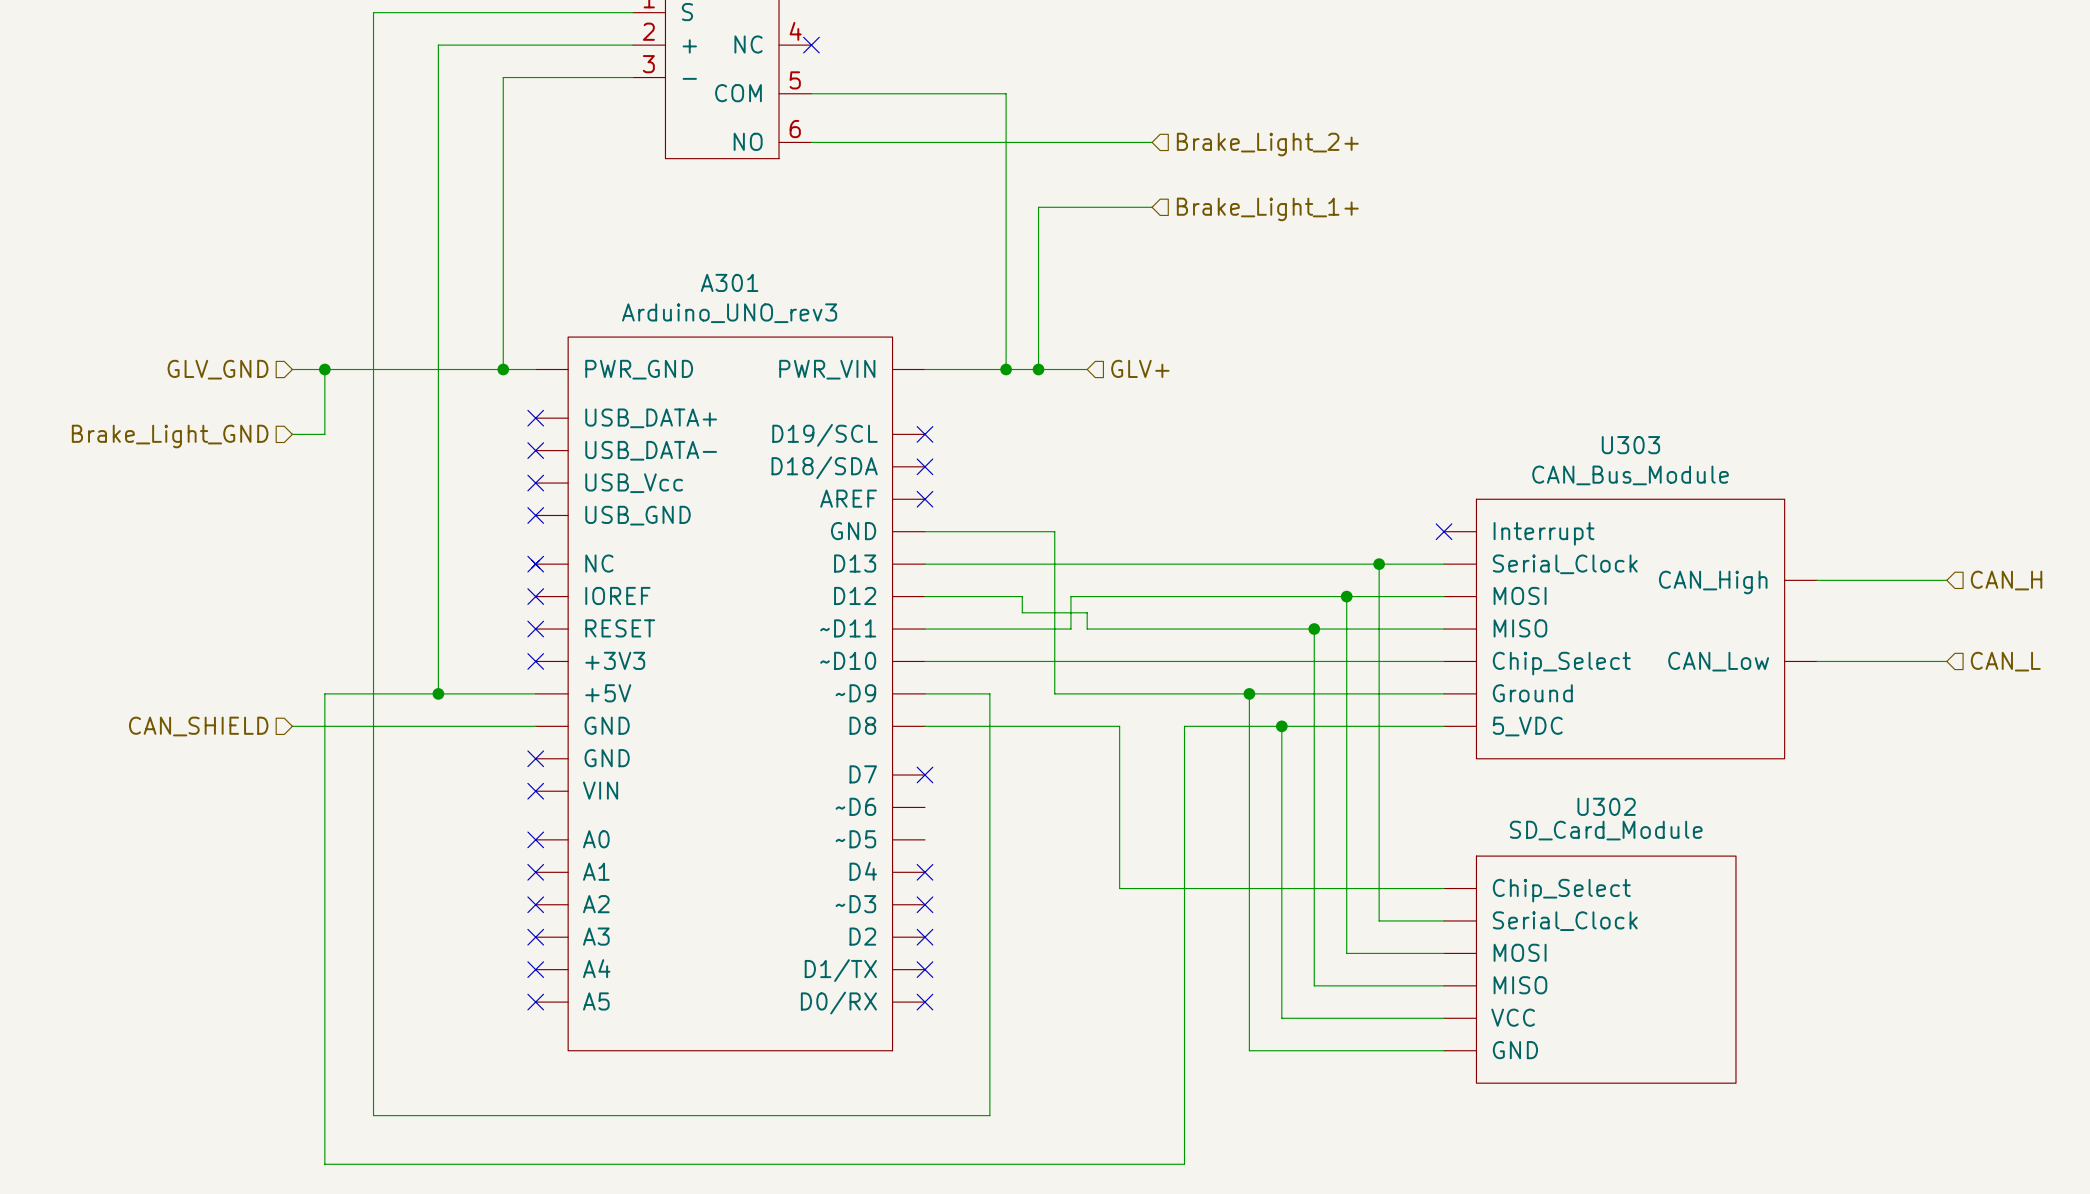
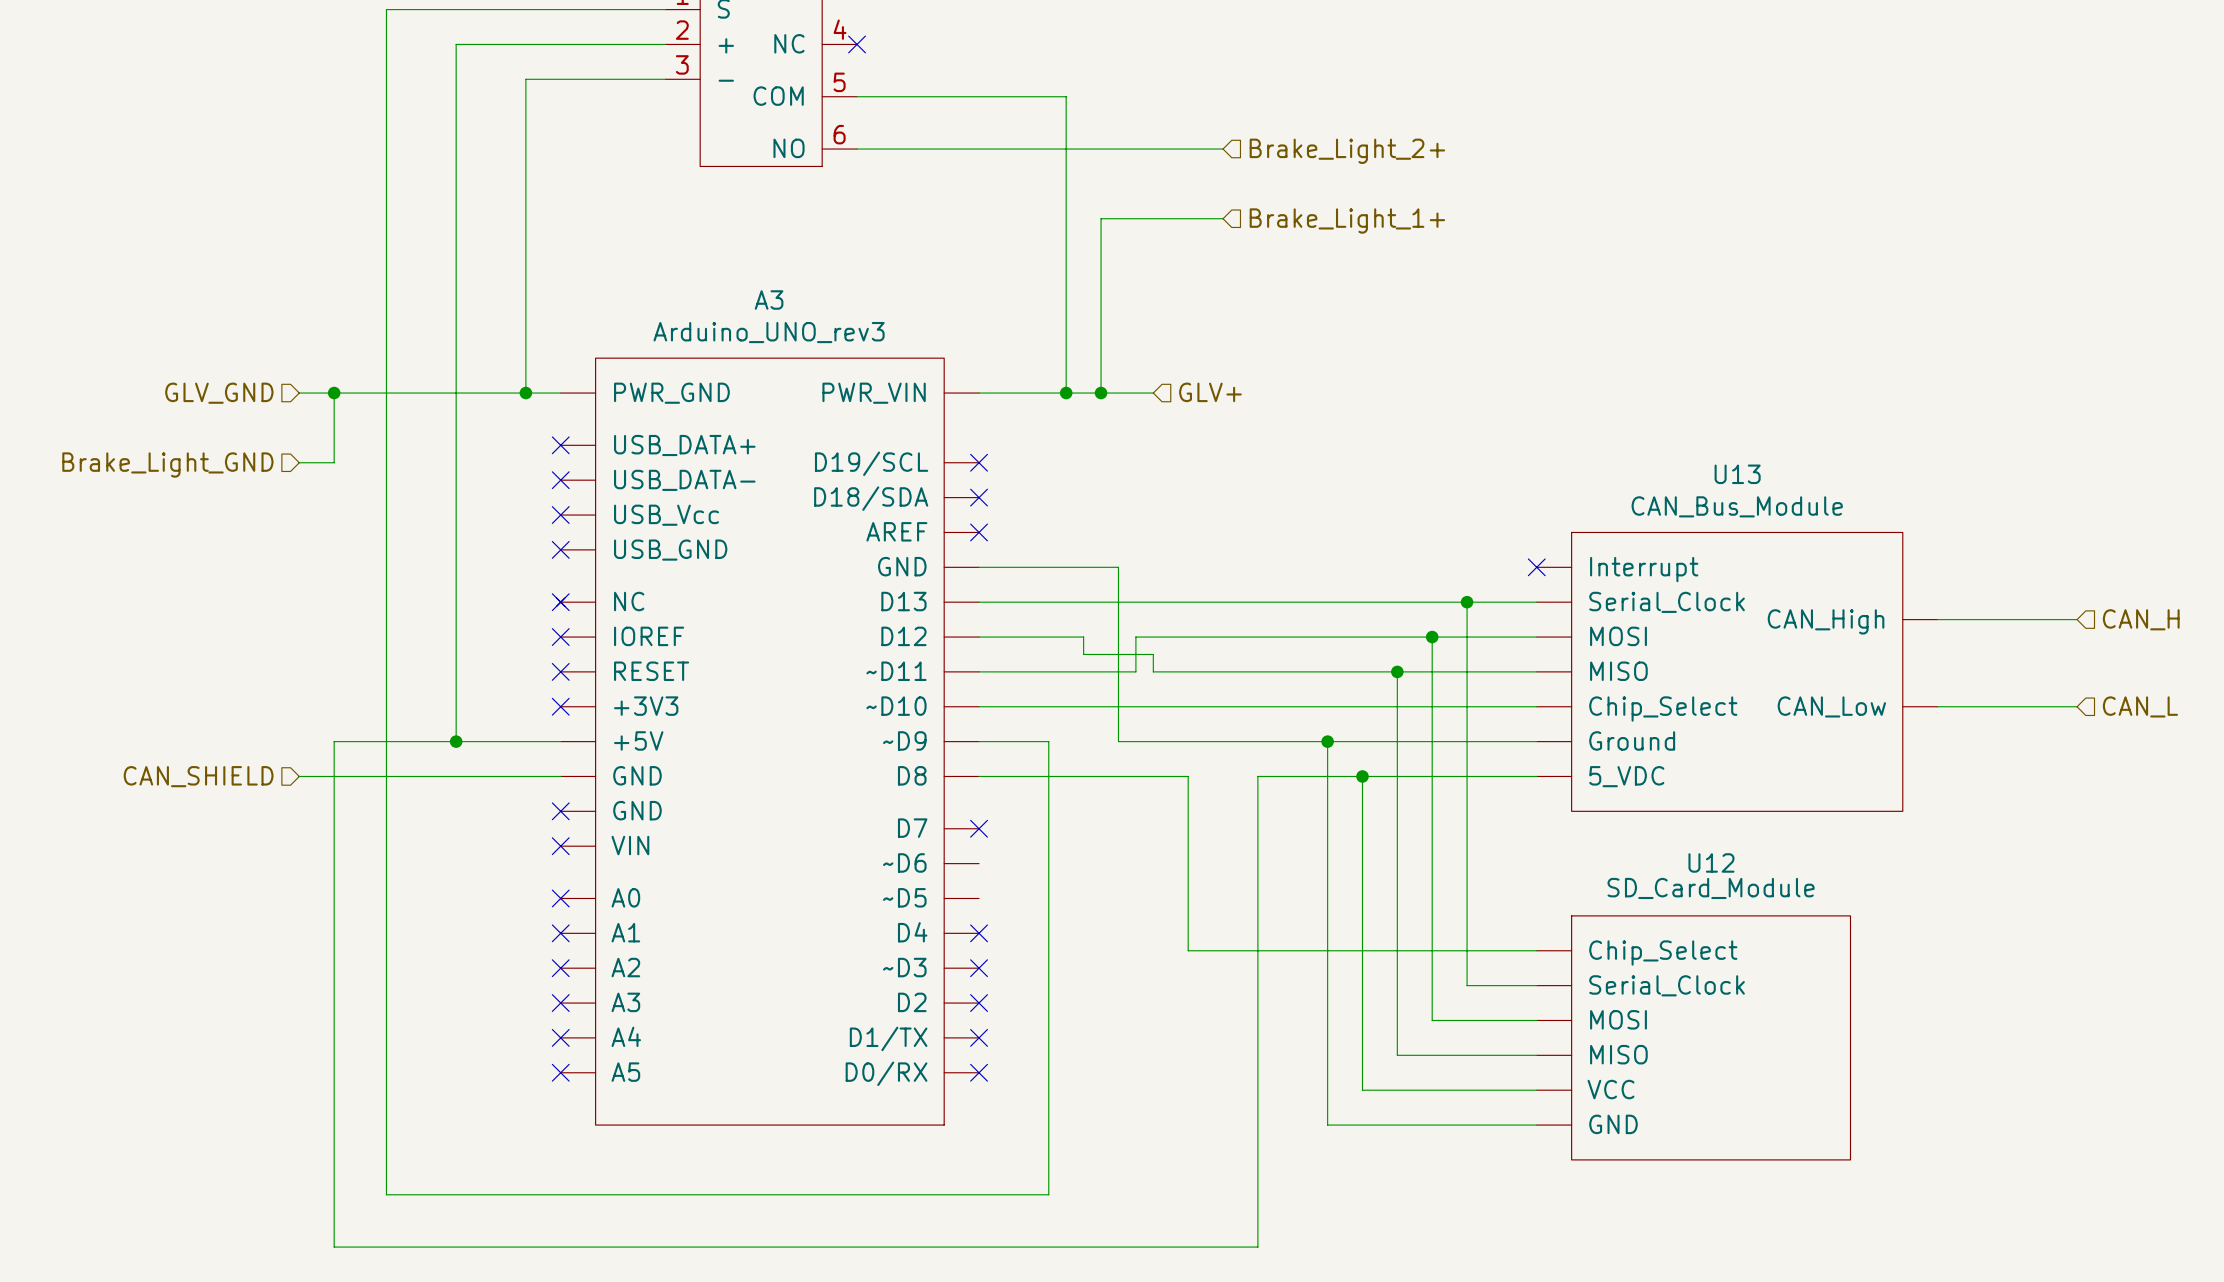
A301 name: A301 (729, 282) -> A3 (769, 300)
U303 name: U303 (1630, 445) -> U13 (1737, 474)
U302 name: U302 (1606, 806) -> U12 (1711, 862)

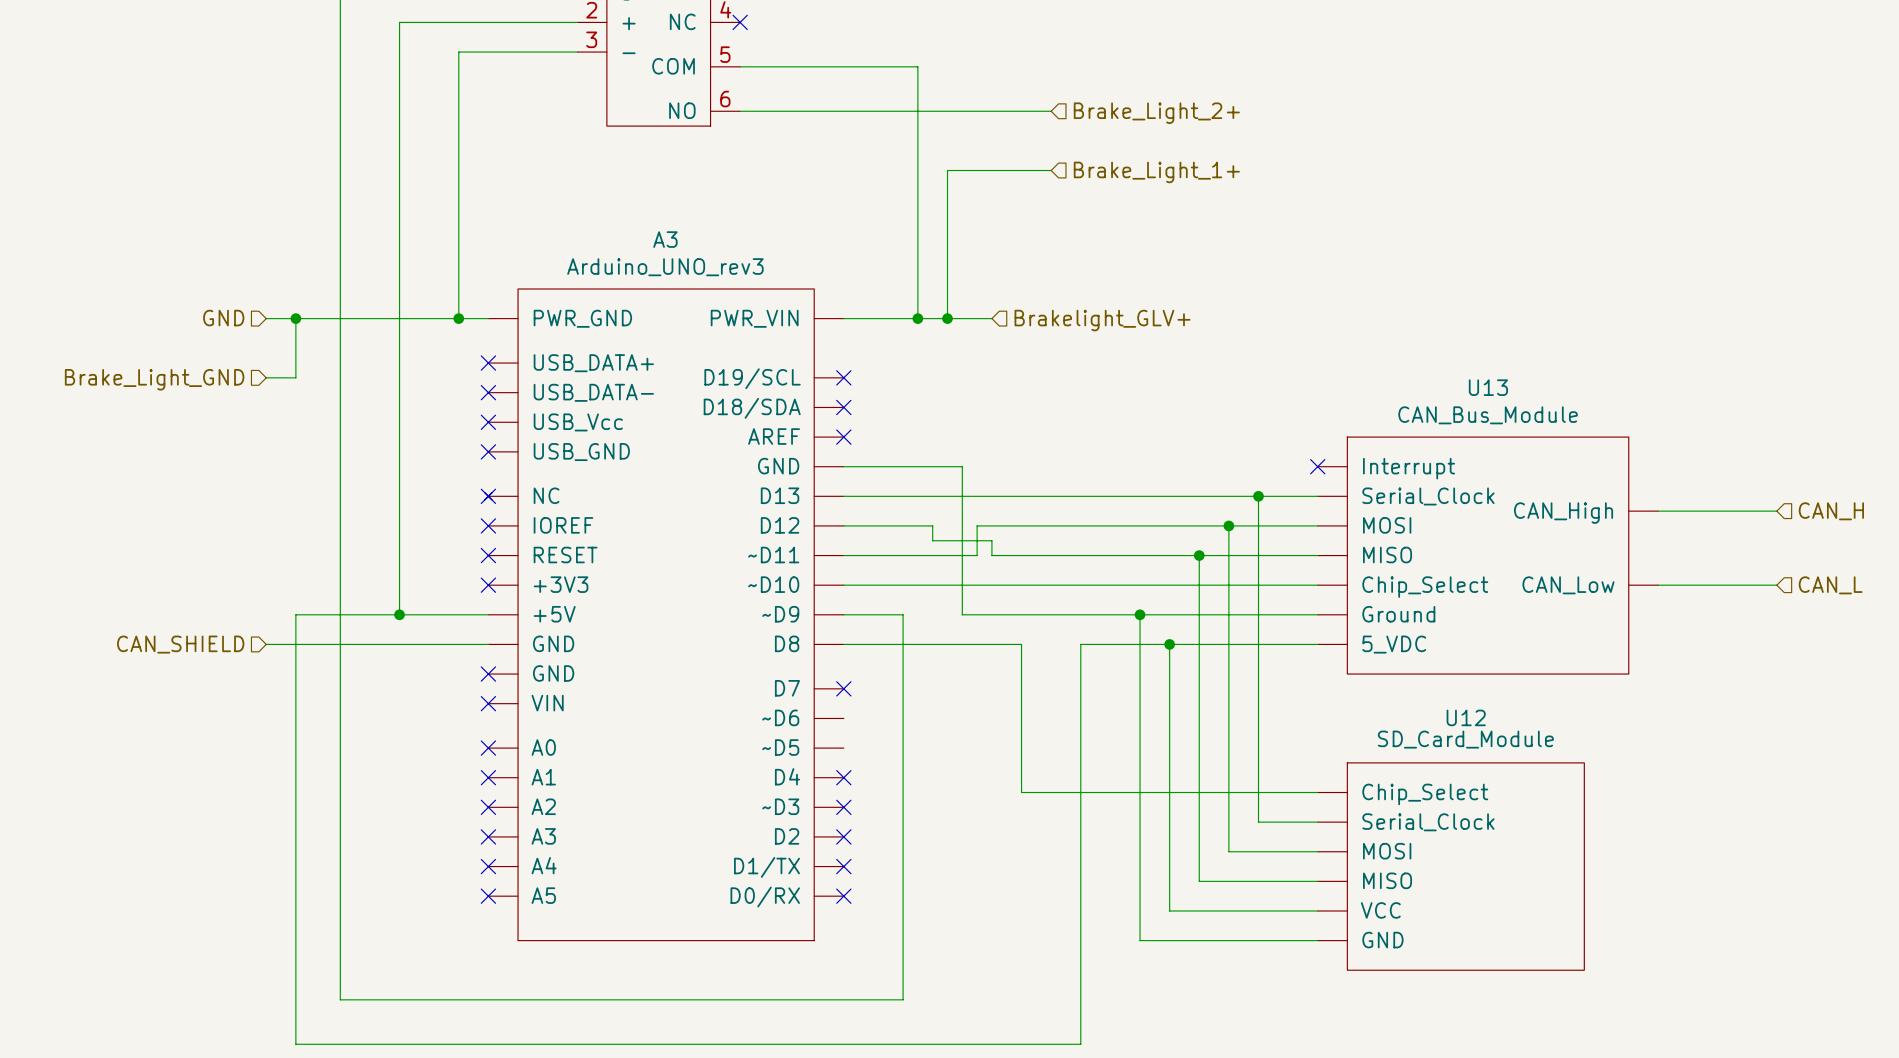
hierarchical label: GLV+ (1210, 392) -> Brakelight_GLV+ (1102, 320)
hierarchical label: GLV_GND (219, 393) -> GND (223, 318)

